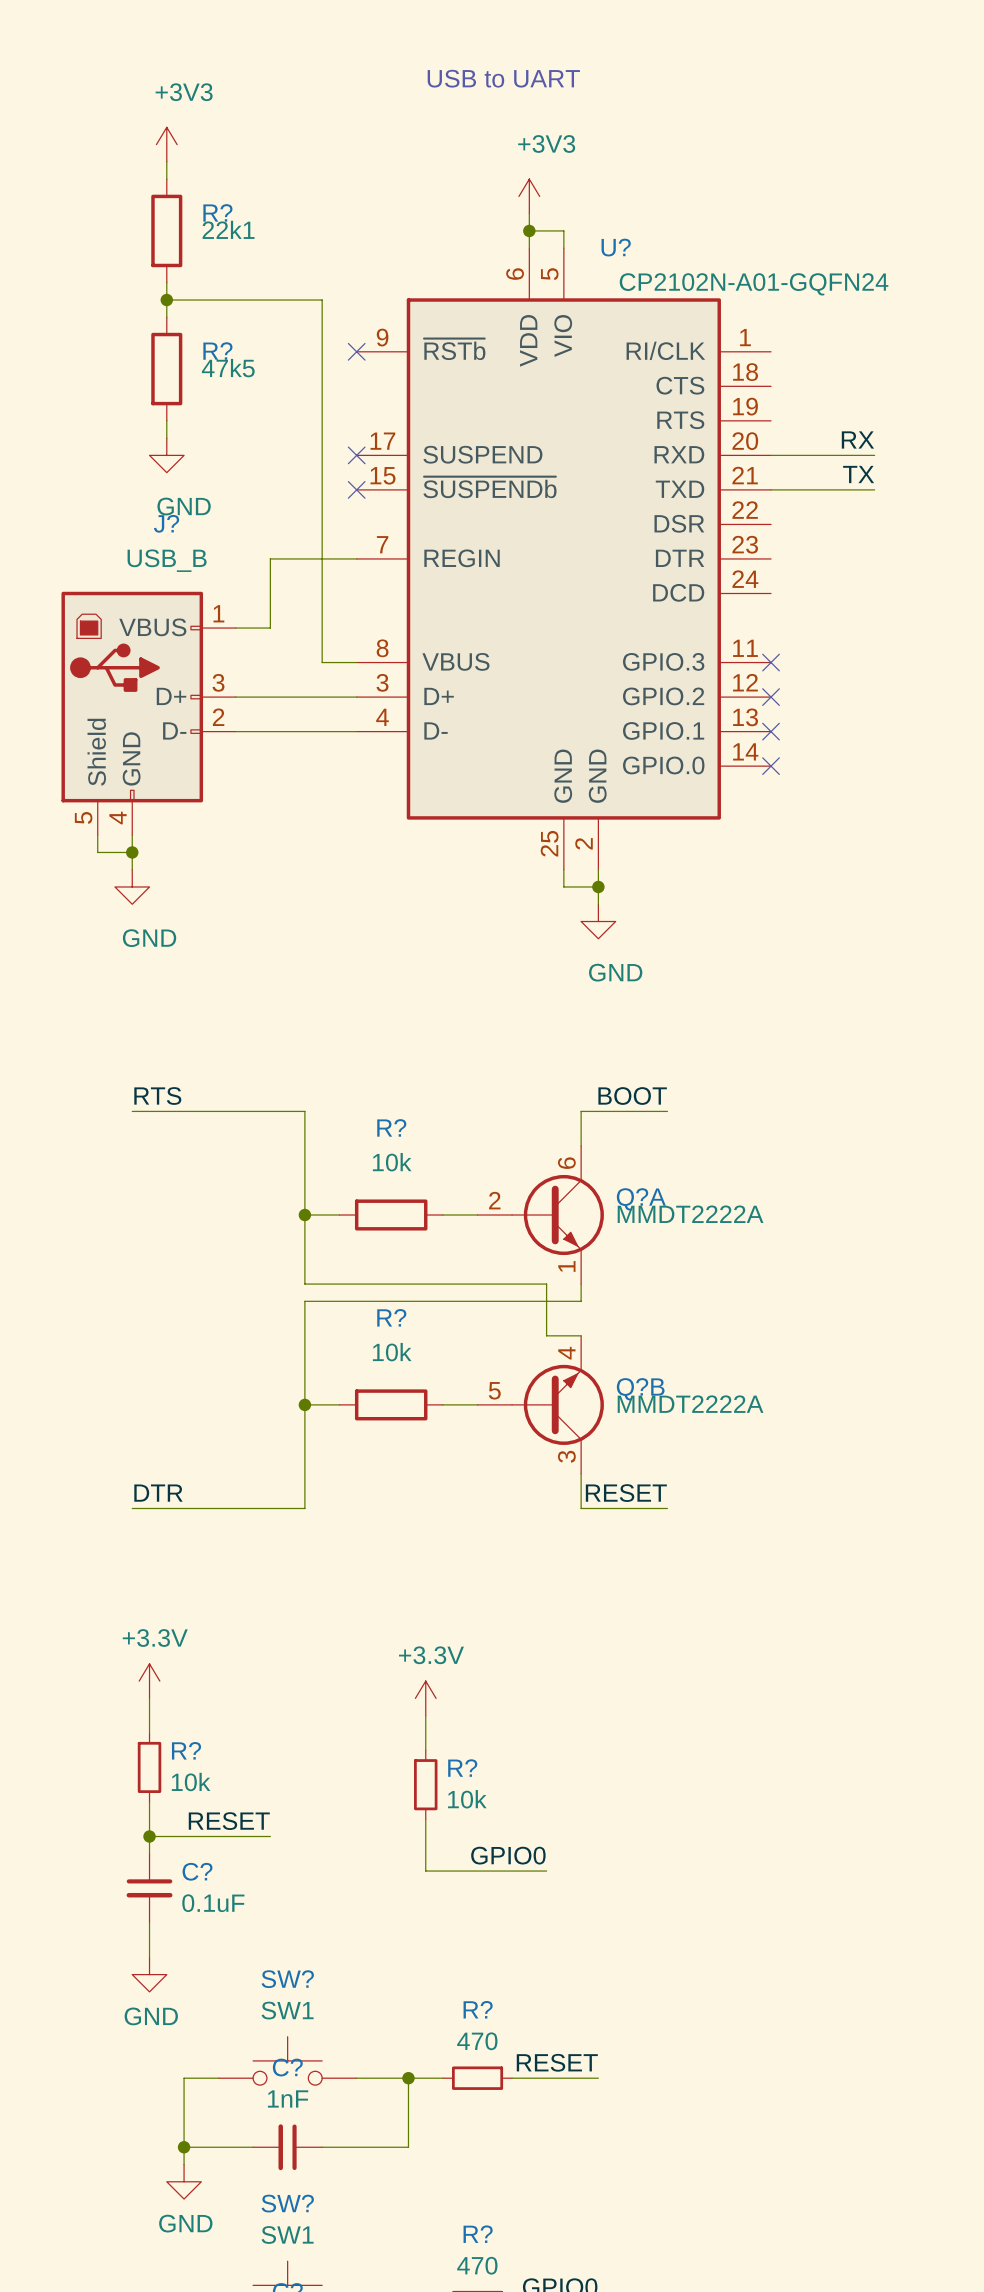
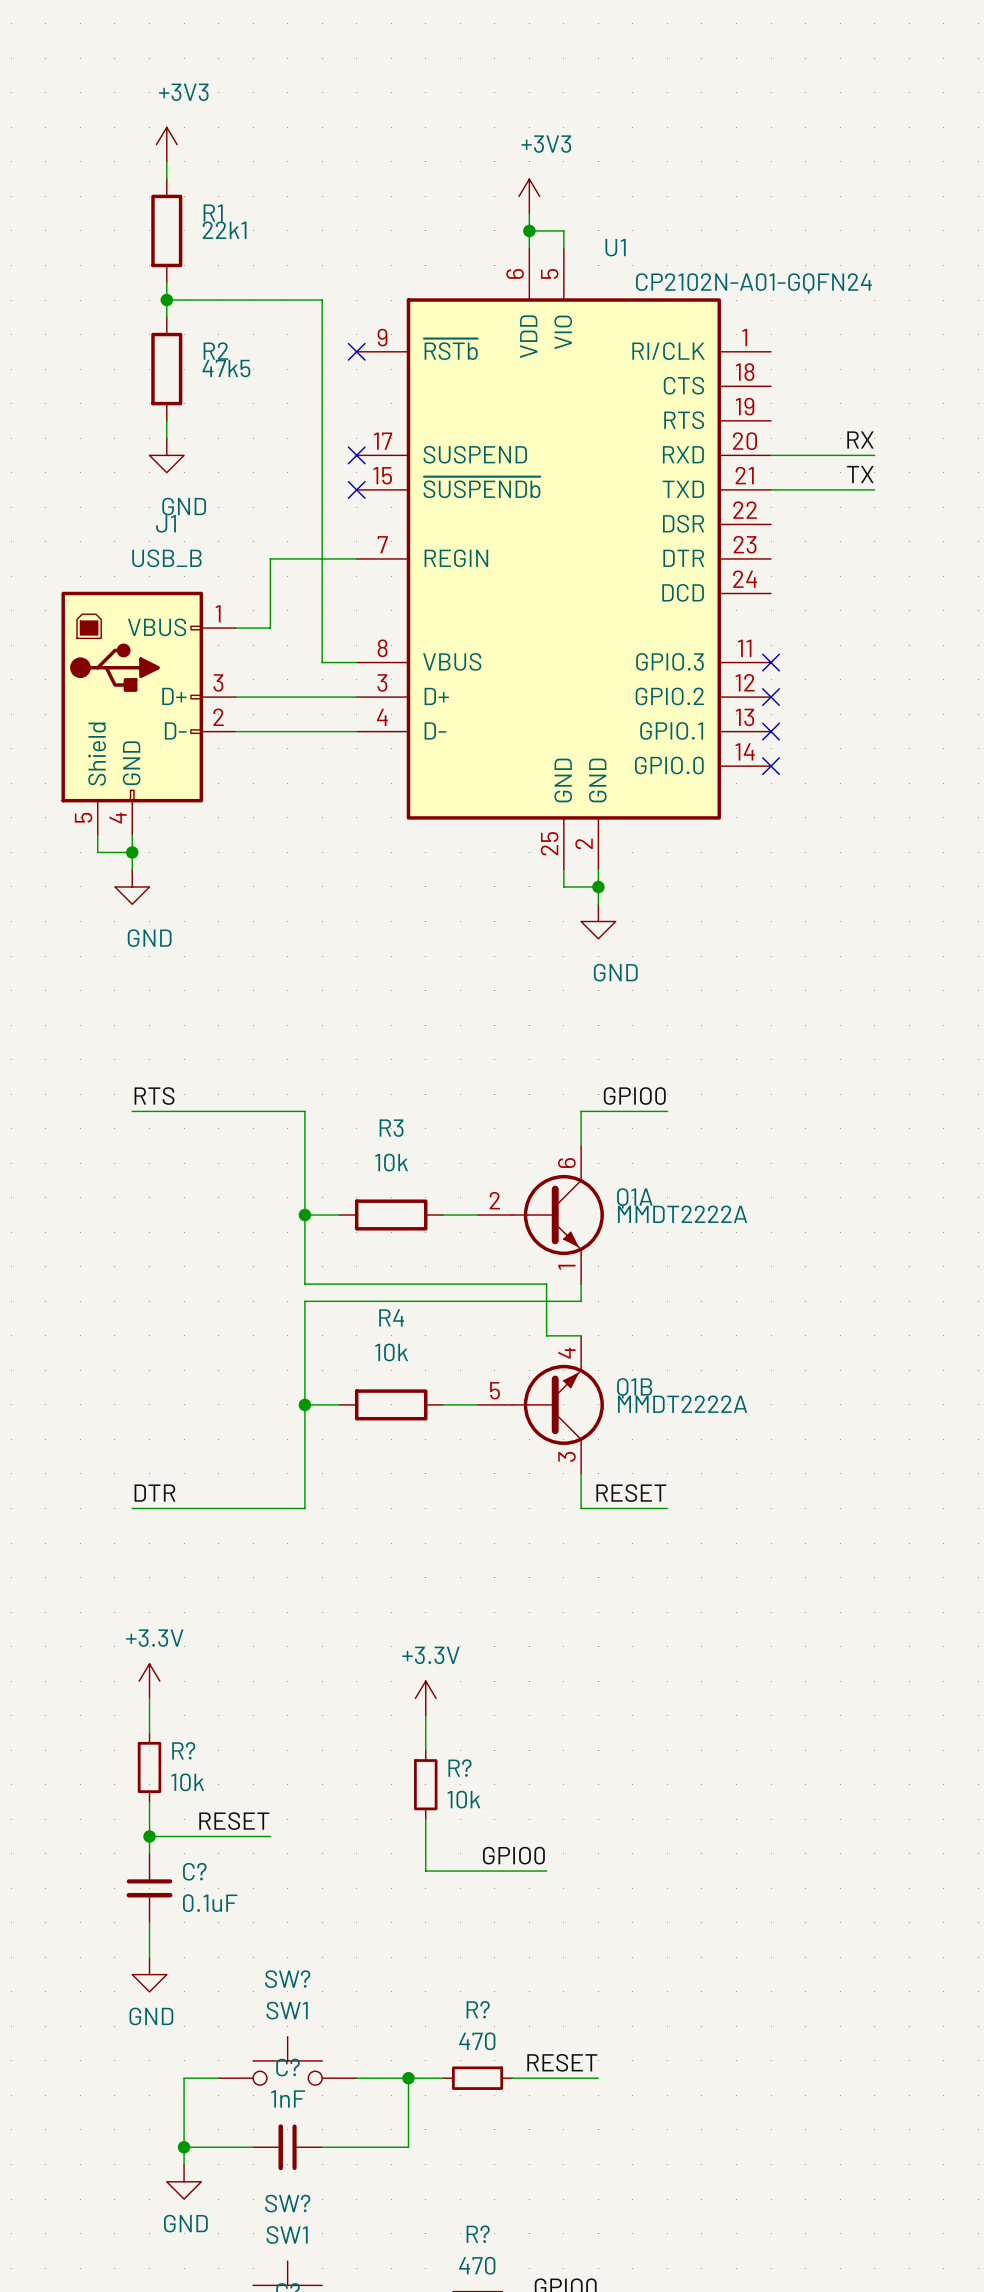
text: USB to UART (503, 78) -> none
R? name: R? (217, 212) -> R1 (213, 213)
U? name: U? (616, 247) -> U1 (615, 247)
R? name: R? (217, 351) -> R2 (215, 351)
J? name: J? (166, 523) -> J1 (166, 523)
label: BOOT (632, 1096) -> GPIO0 (634, 1096)
R? name: R? (391, 1127) -> R3 (391, 1128)
Q?A name: Q?A (641, 1199) -> Q1A (634, 1198)
R? name: R? (391, 1317) -> R4 (391, 1317)
Q?B name: Q?B (640, 1389) -> Q1B (634, 1388)

